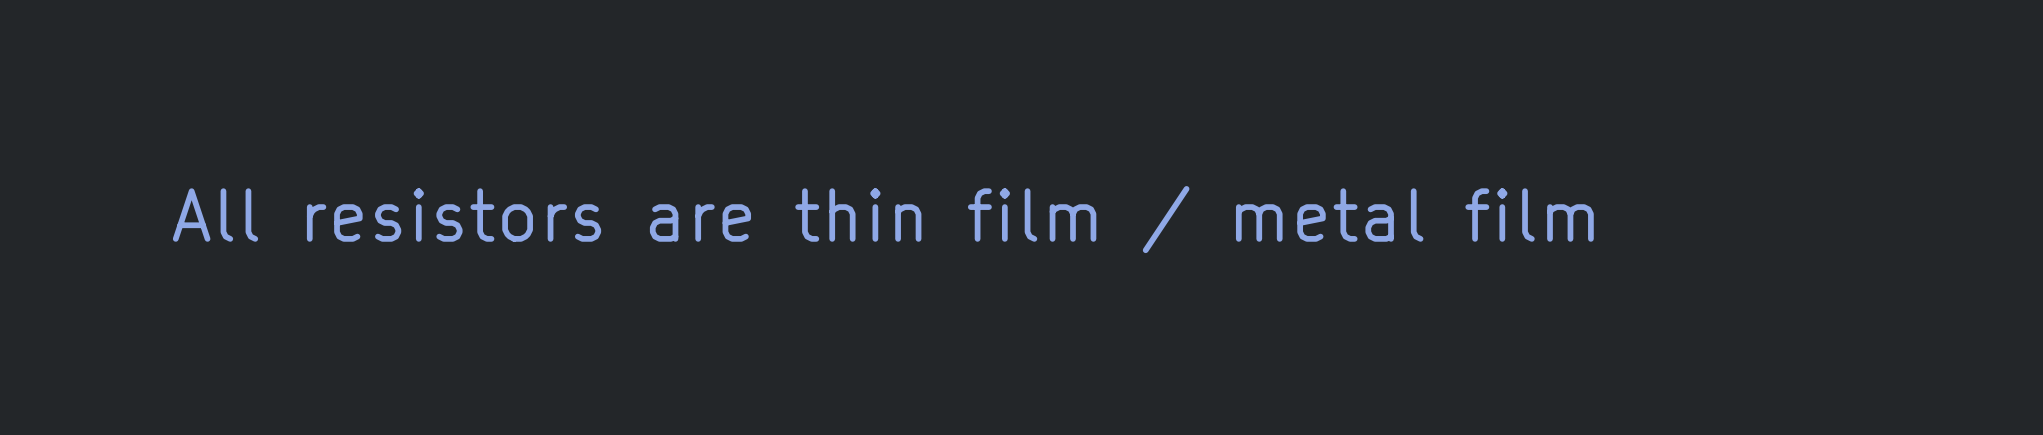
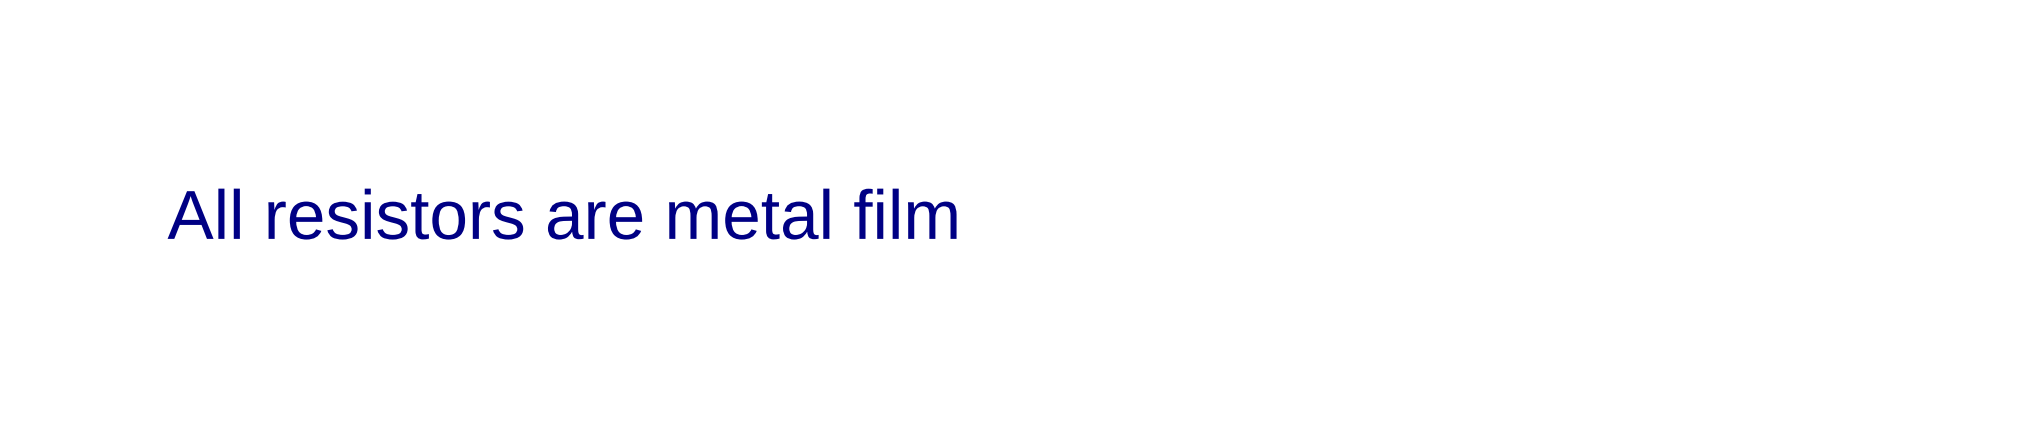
text: All resistors are thin film / metal film (883, 219) -> All resistors are metal film (562, 214)

